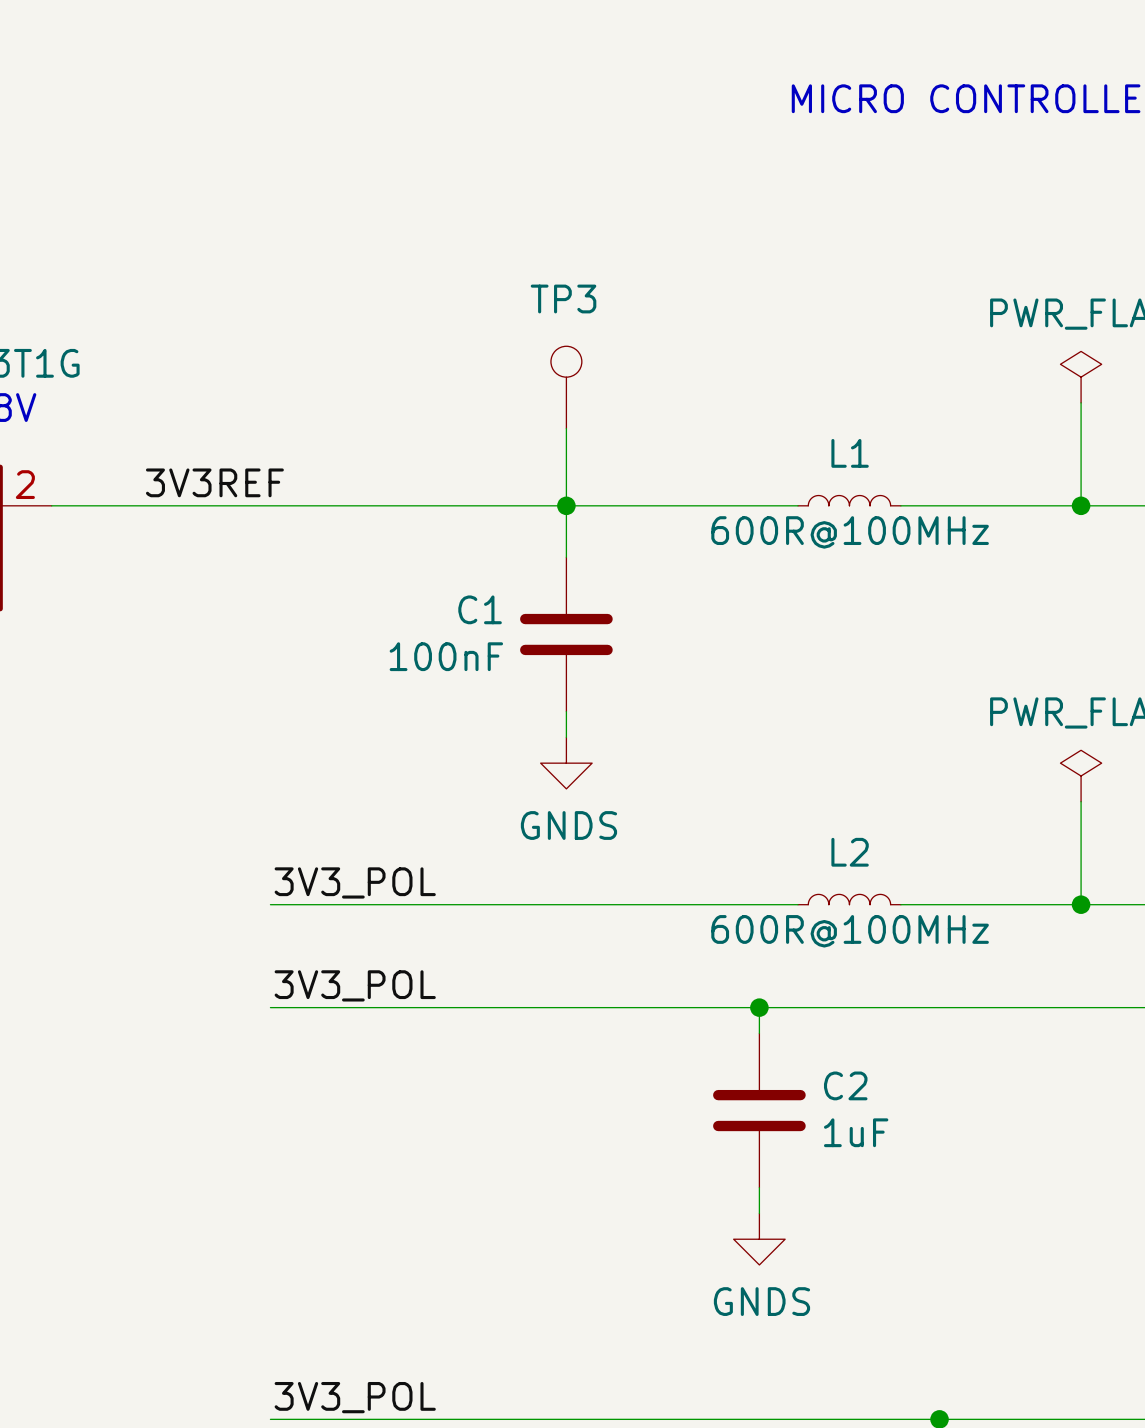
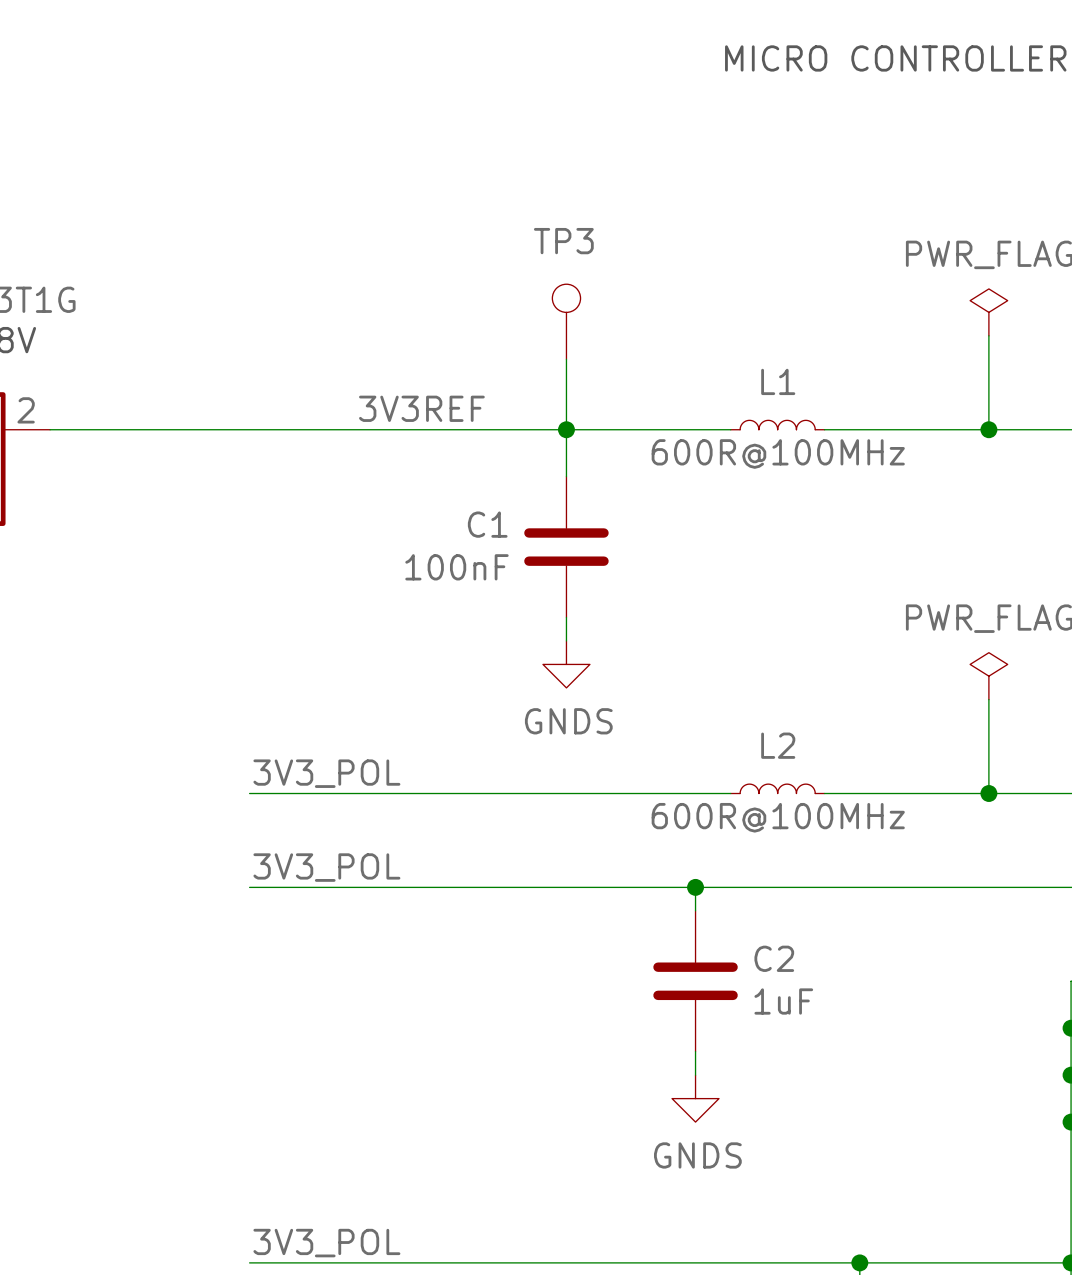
TP3 position: (566, 387) -> (566, 321)
wire: (566, 428) (566, 557) -> (566, 359) (566, 476)
label position: 3V3REF (214, 482) -> 3V3REF (421, 408)
junction position: (566, 505) -> (566, 429)
C1 position: (566, 634) -> (566, 547)
wire: (566, 711) (566, 737) -> (566, 617) (566, 640)
power symbol position: GNDS (566, 763) -> GNDS (566, 664)

